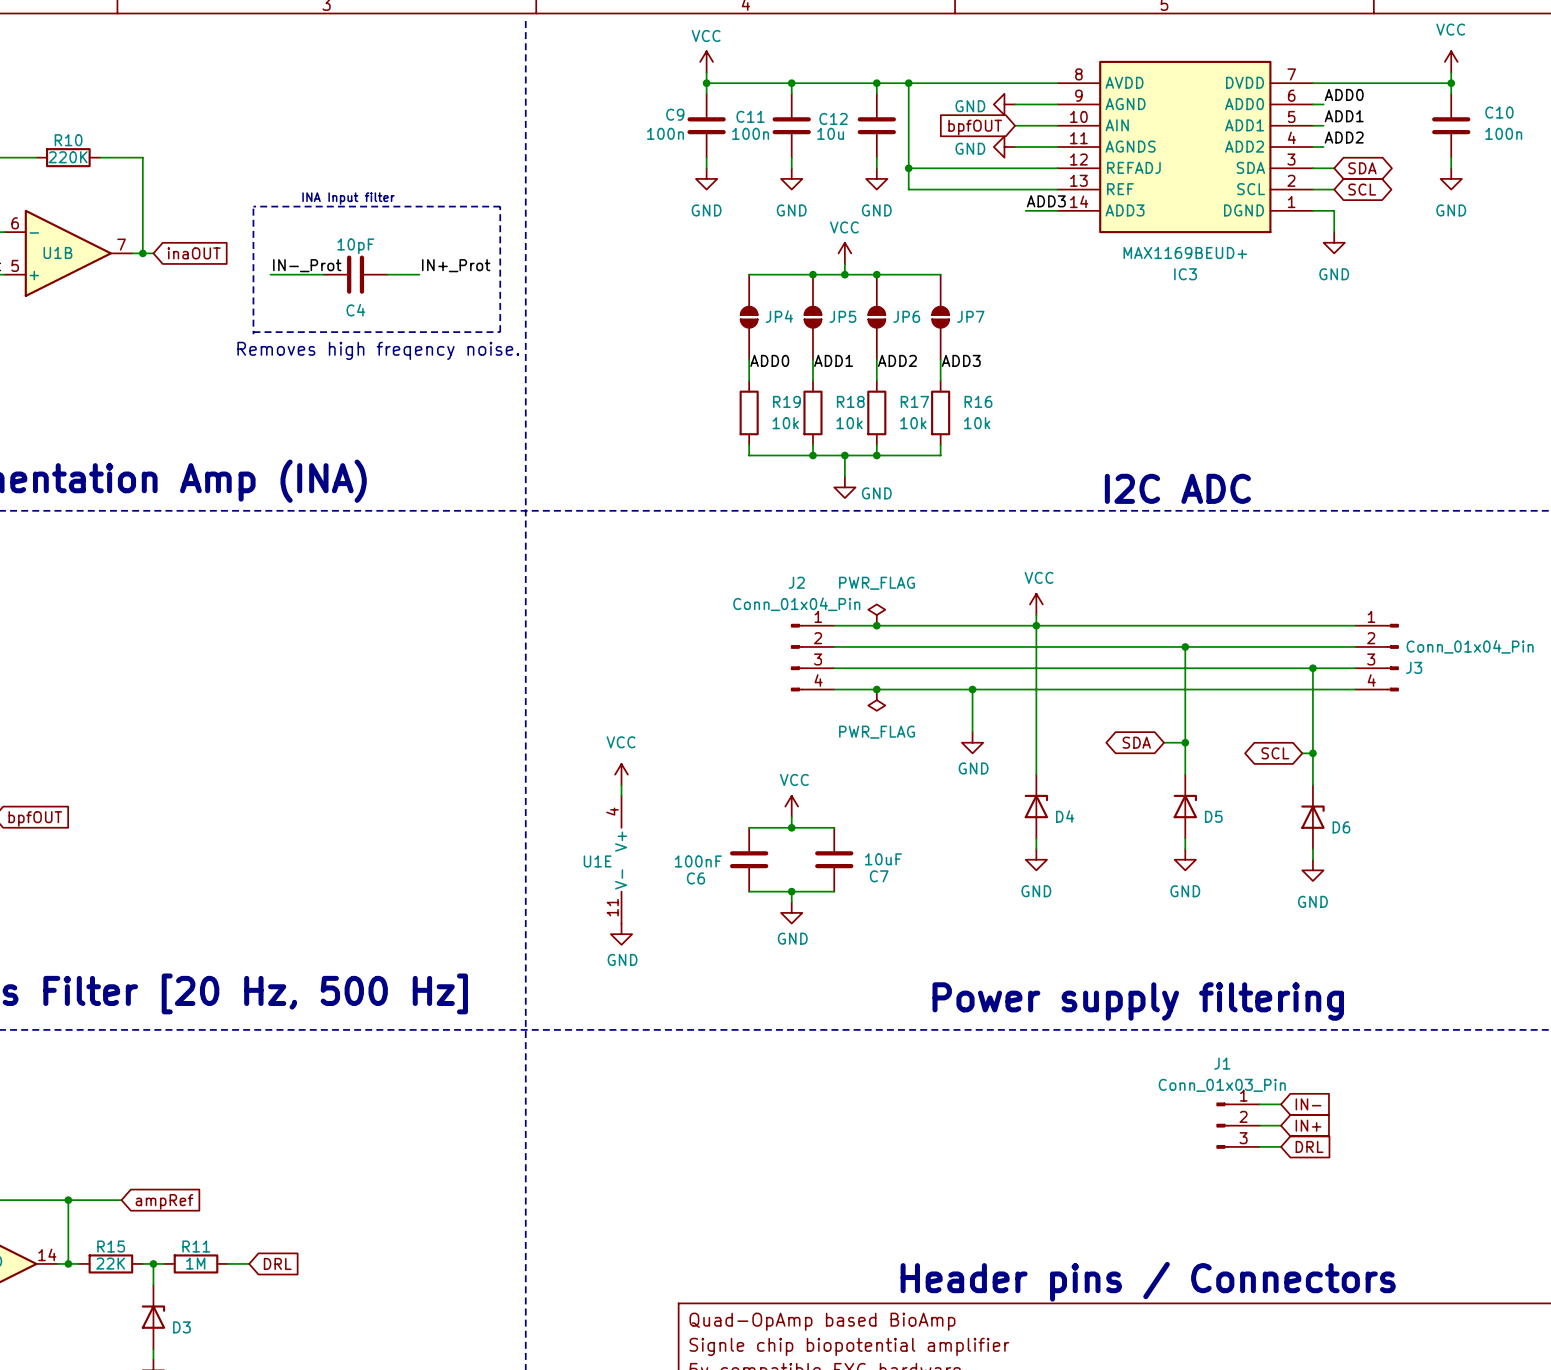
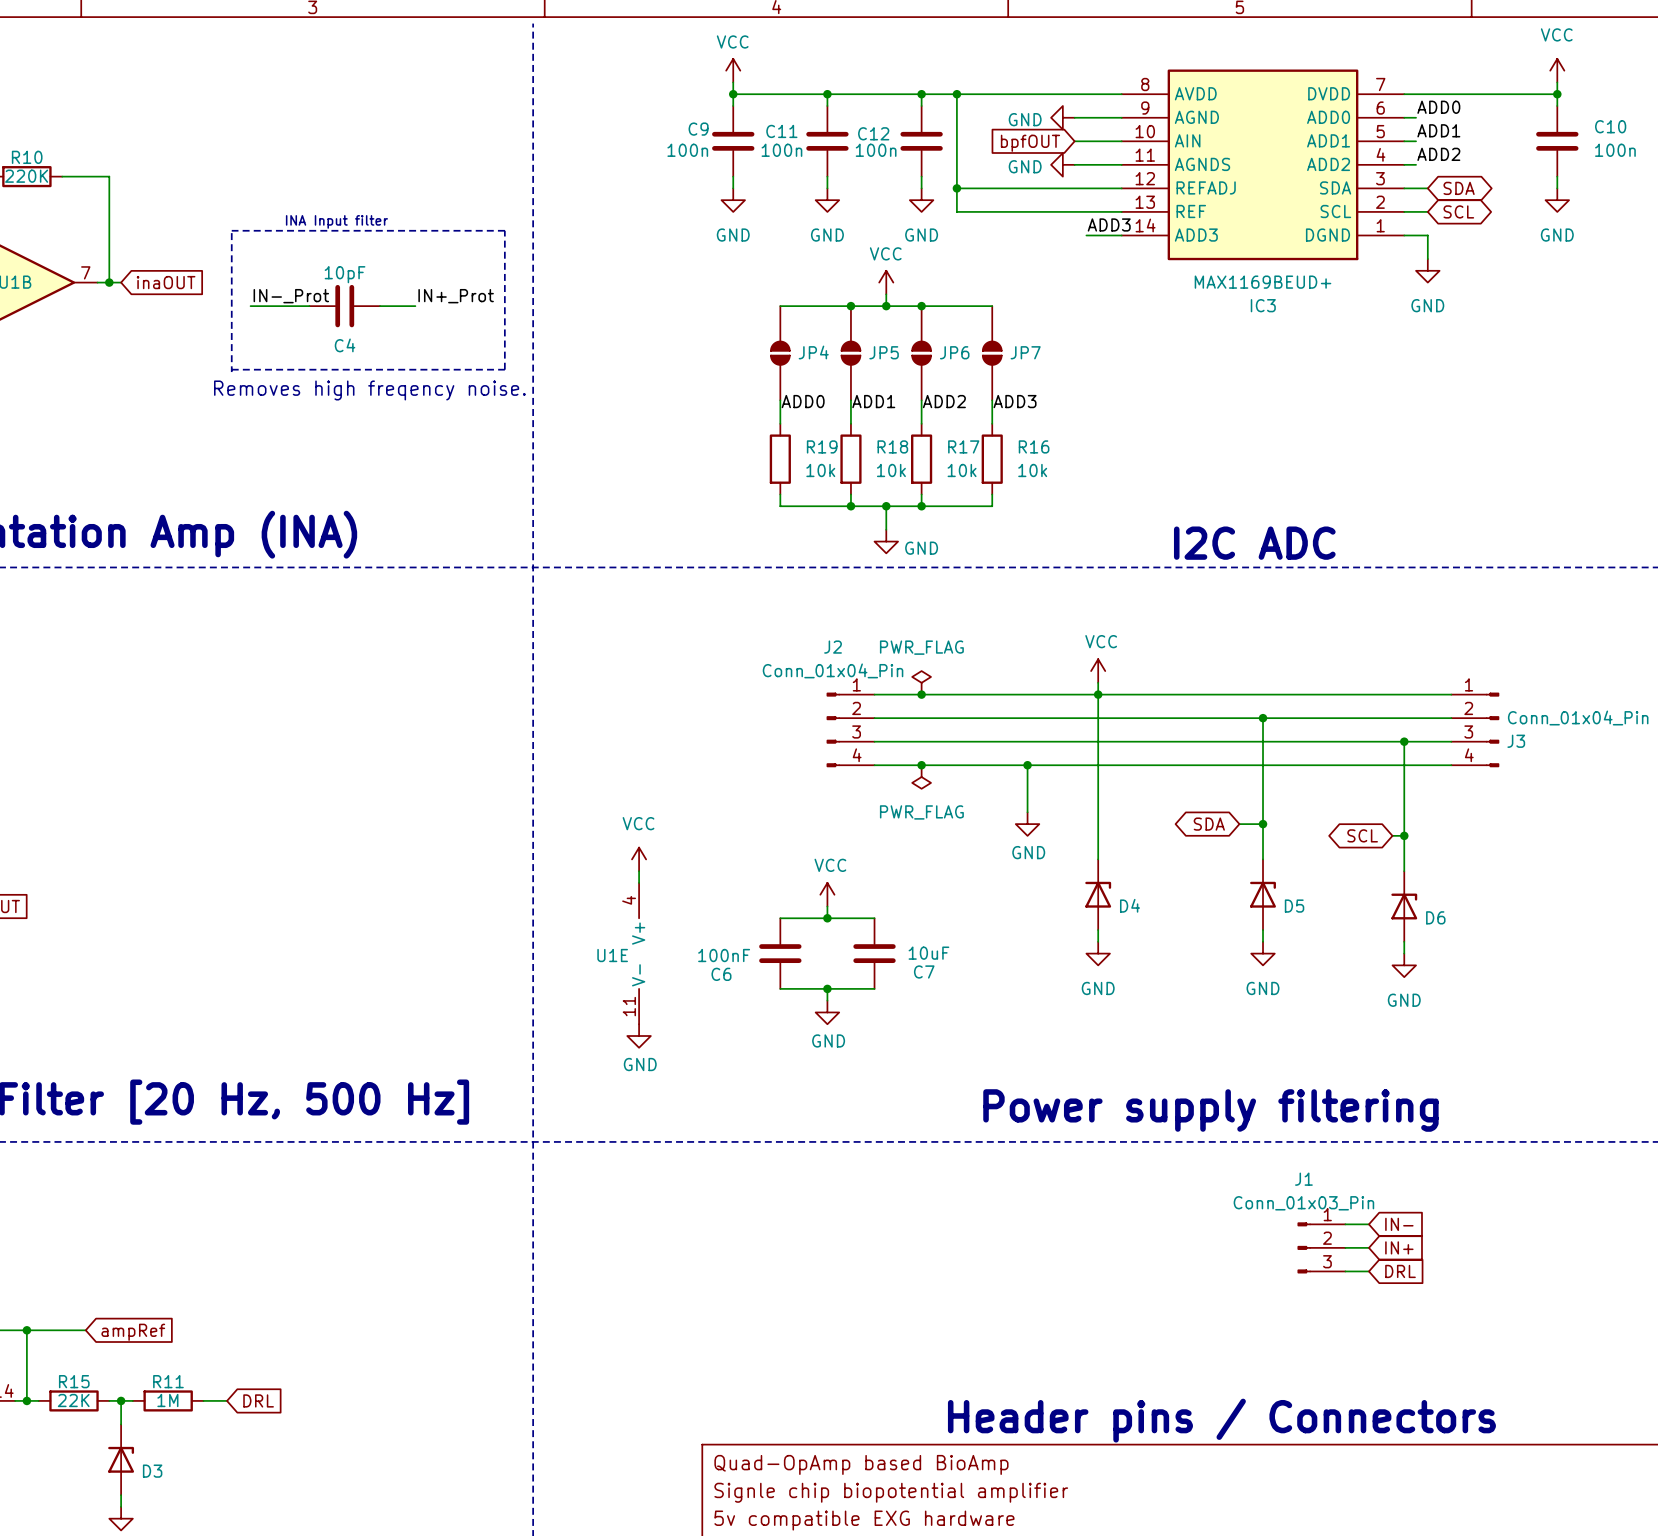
C12 value: 10u (830, 133) -> 100n (876, 150)

